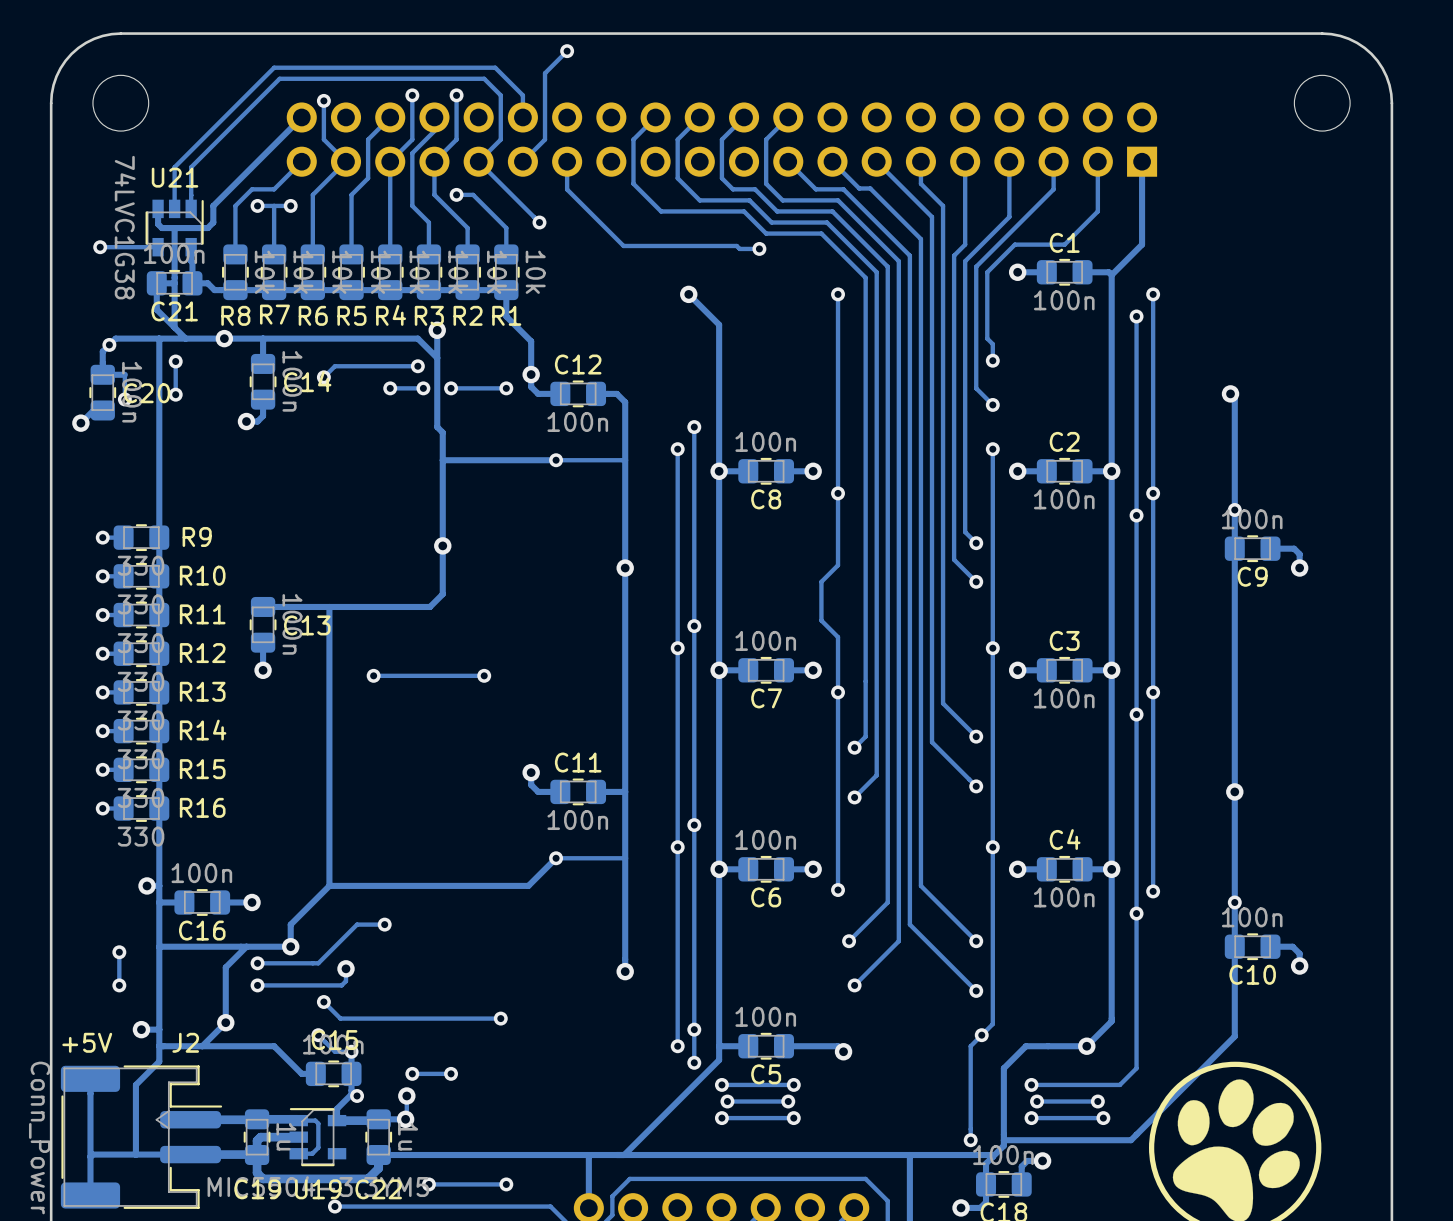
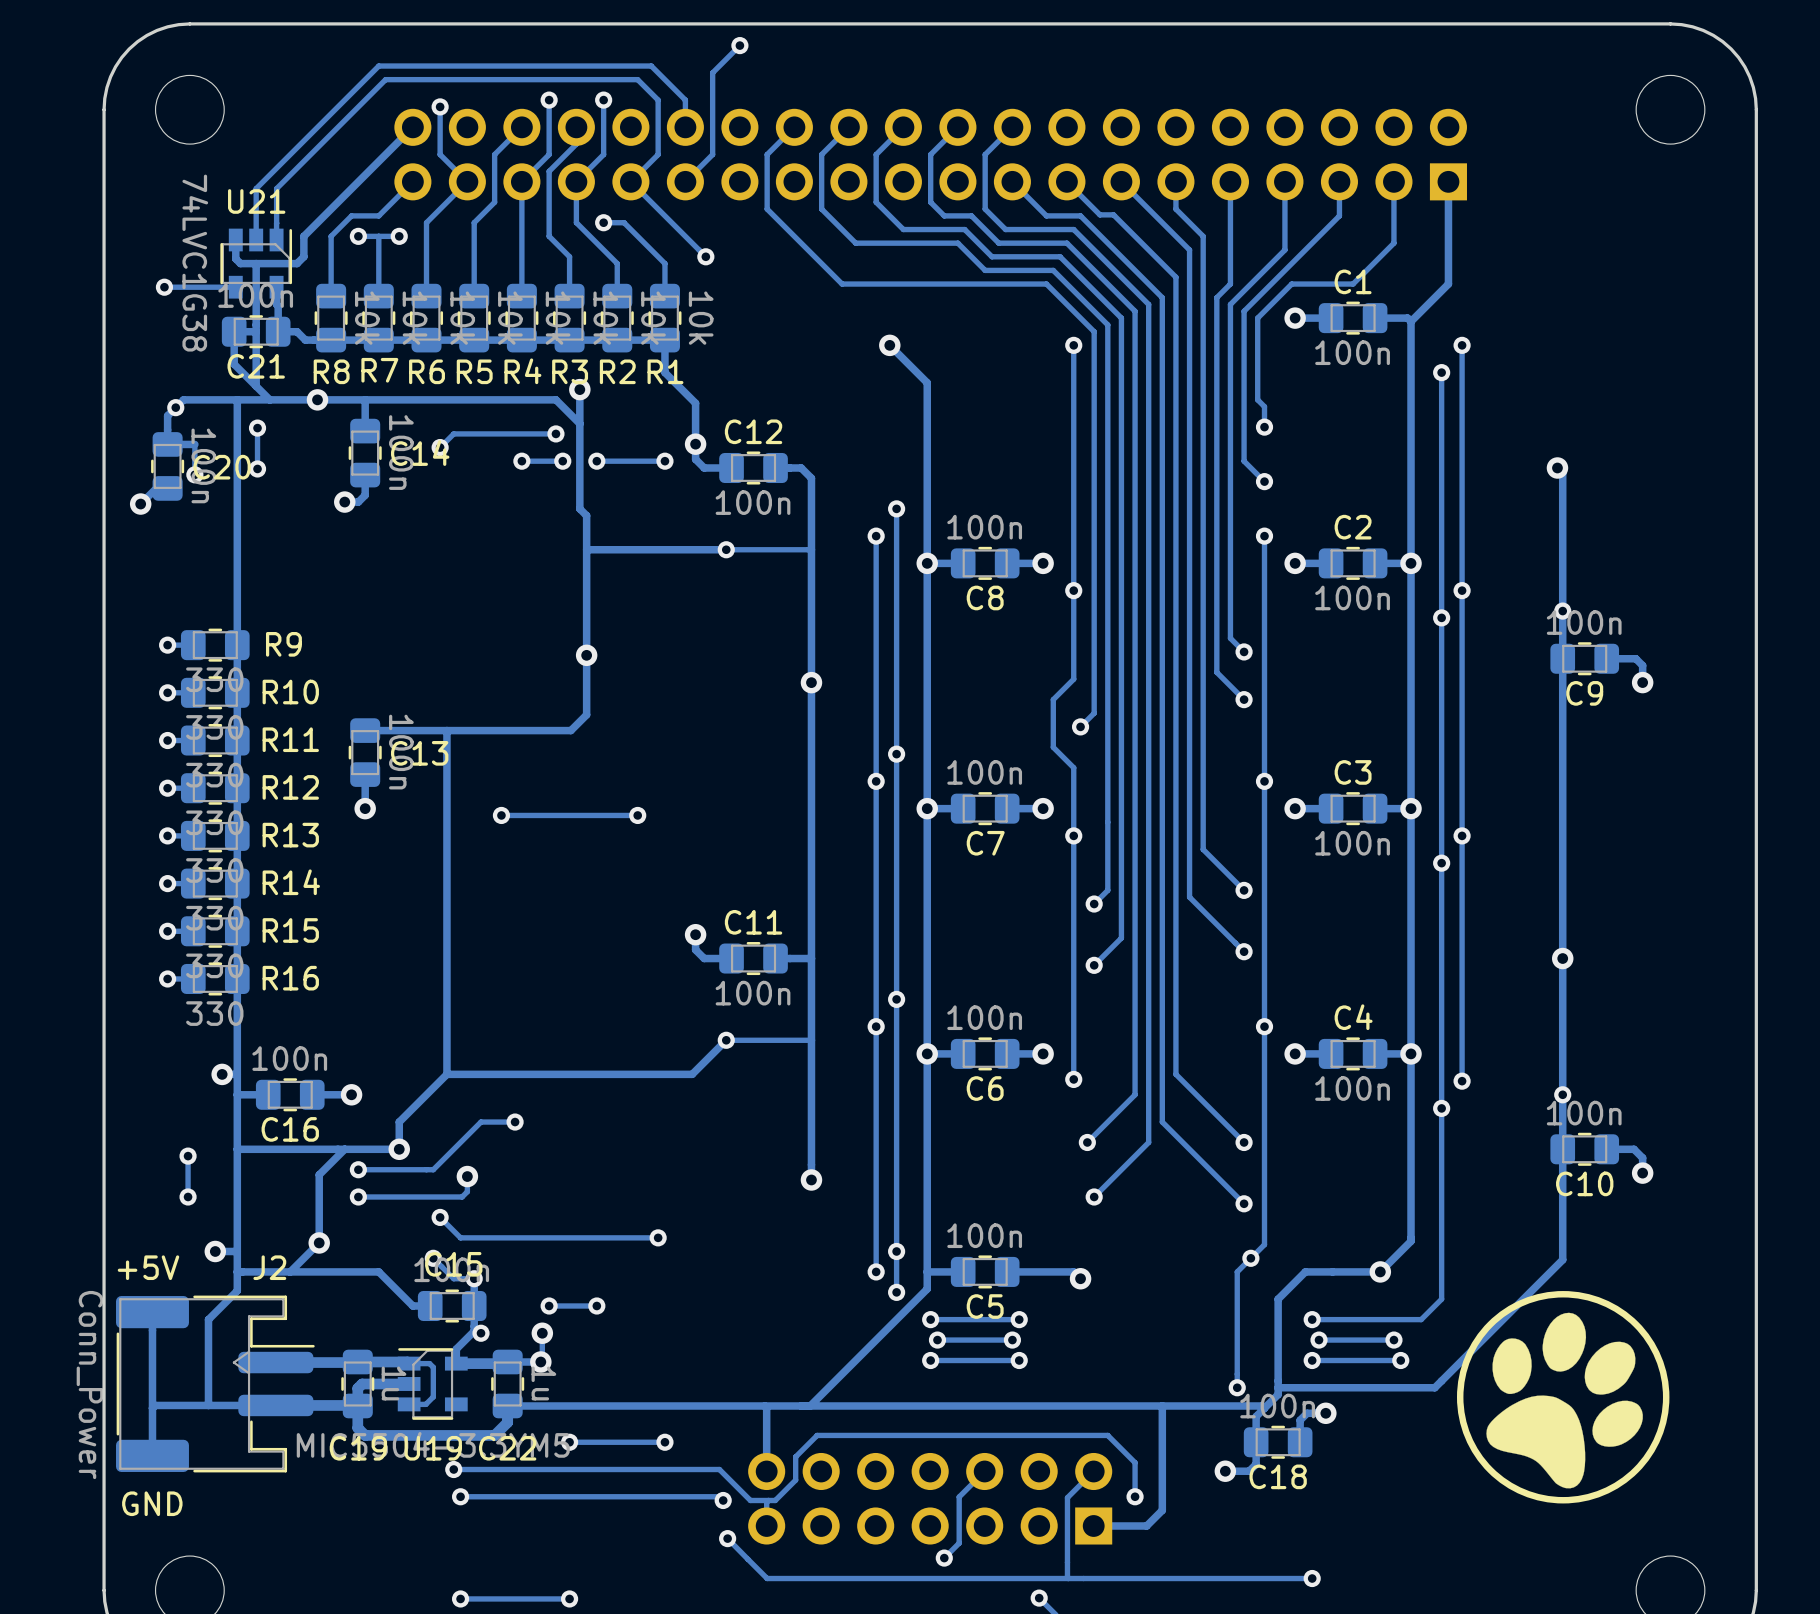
track: none -> (794, 127) (767, 154) (767, 209) (842, 284) (1046, 284) (1094, 331) (1094, 713) (1080, 726)
track: (567, 161) (567, 189) (623, 245) (736, 245) (739, 248) (759, 248) -> none
via: (759, 248) -> none
via: none -> (1080, 726)

